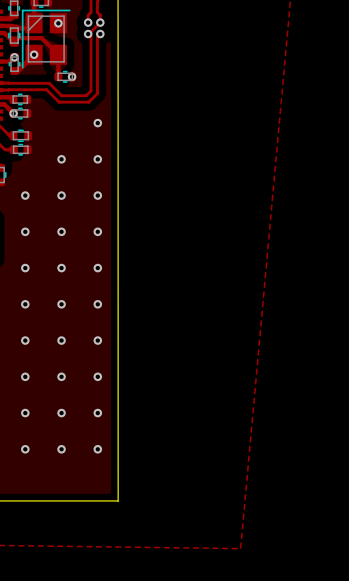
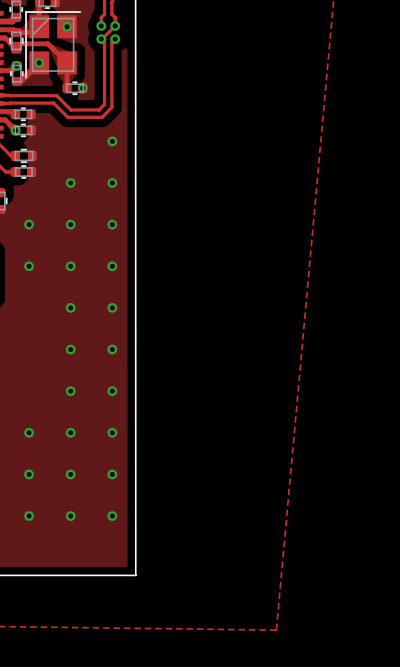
via: (25, 268) -> none
via: (25, 304) -> none
via: (25, 340) -> none

